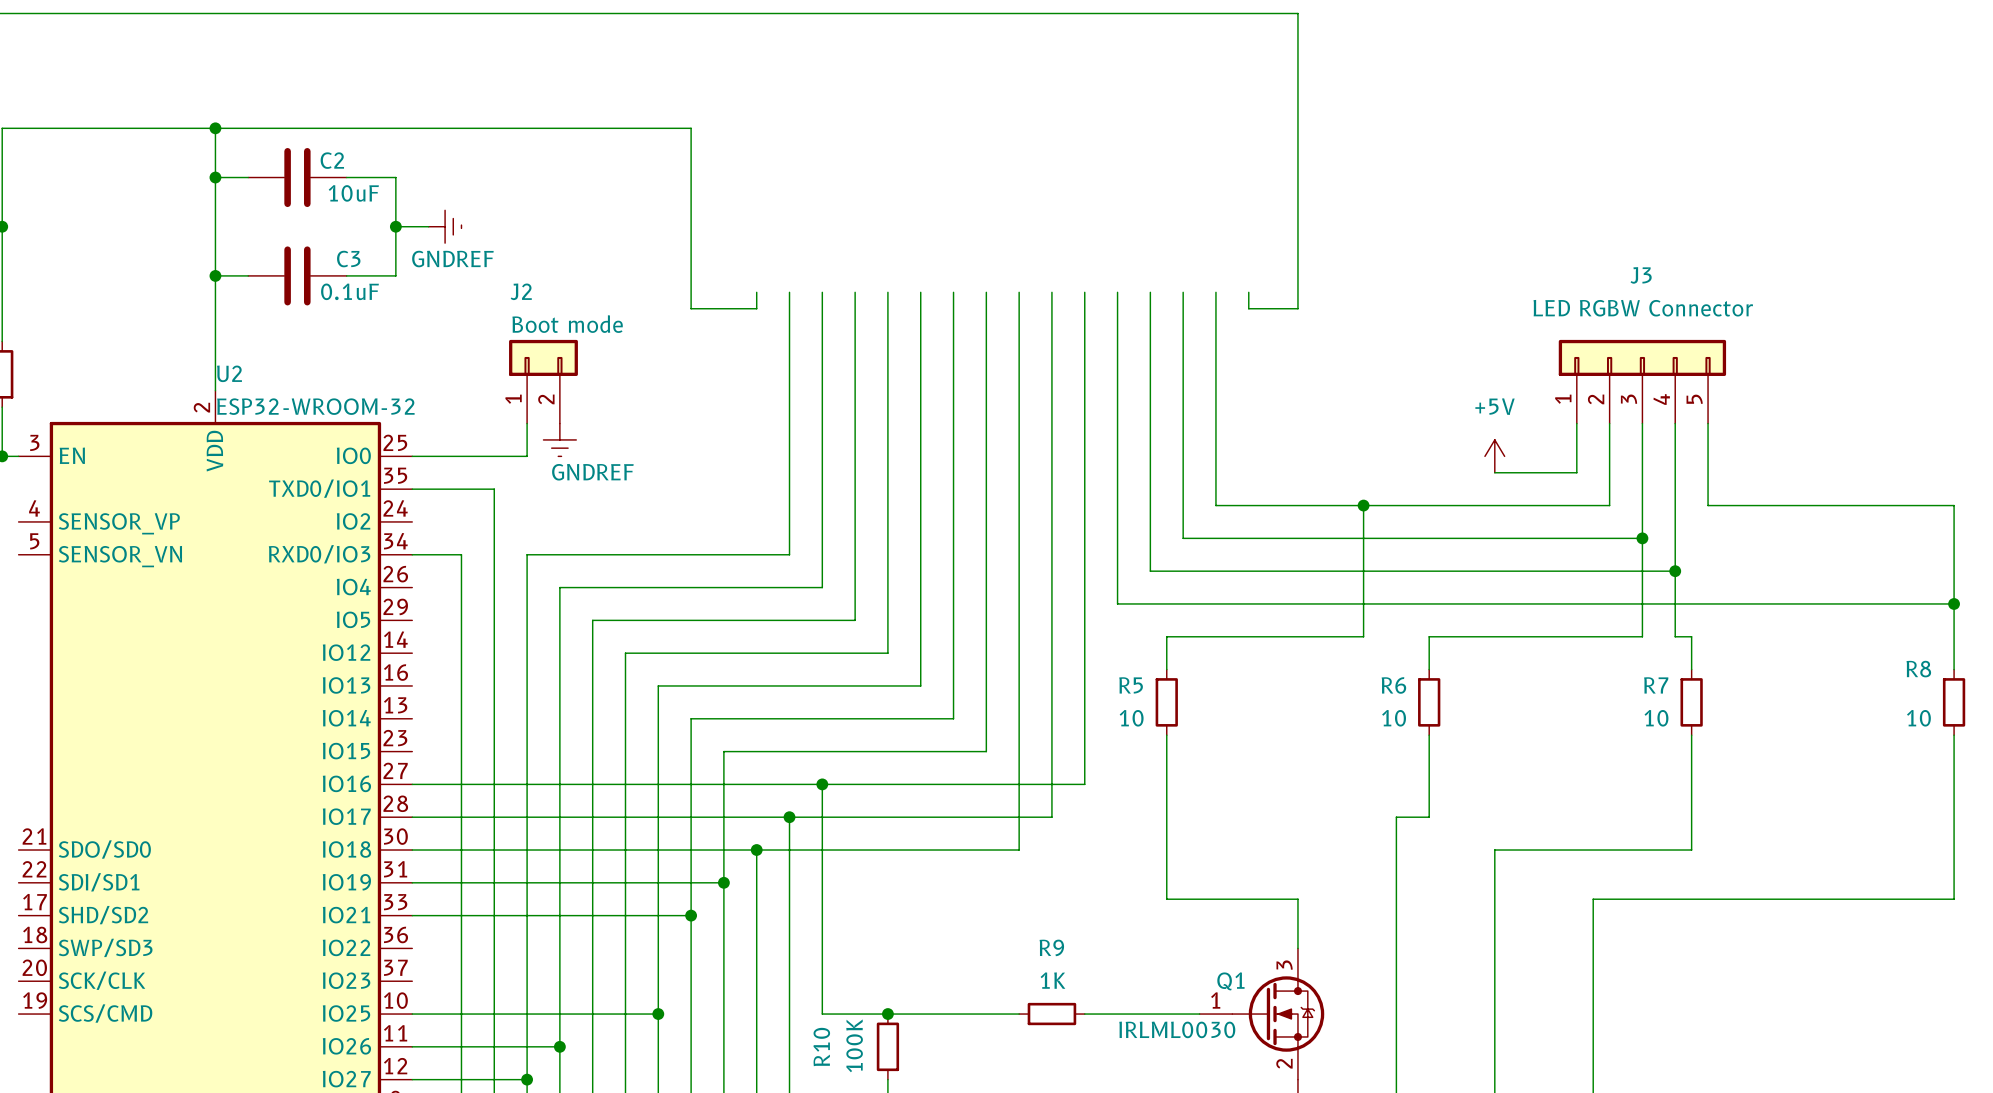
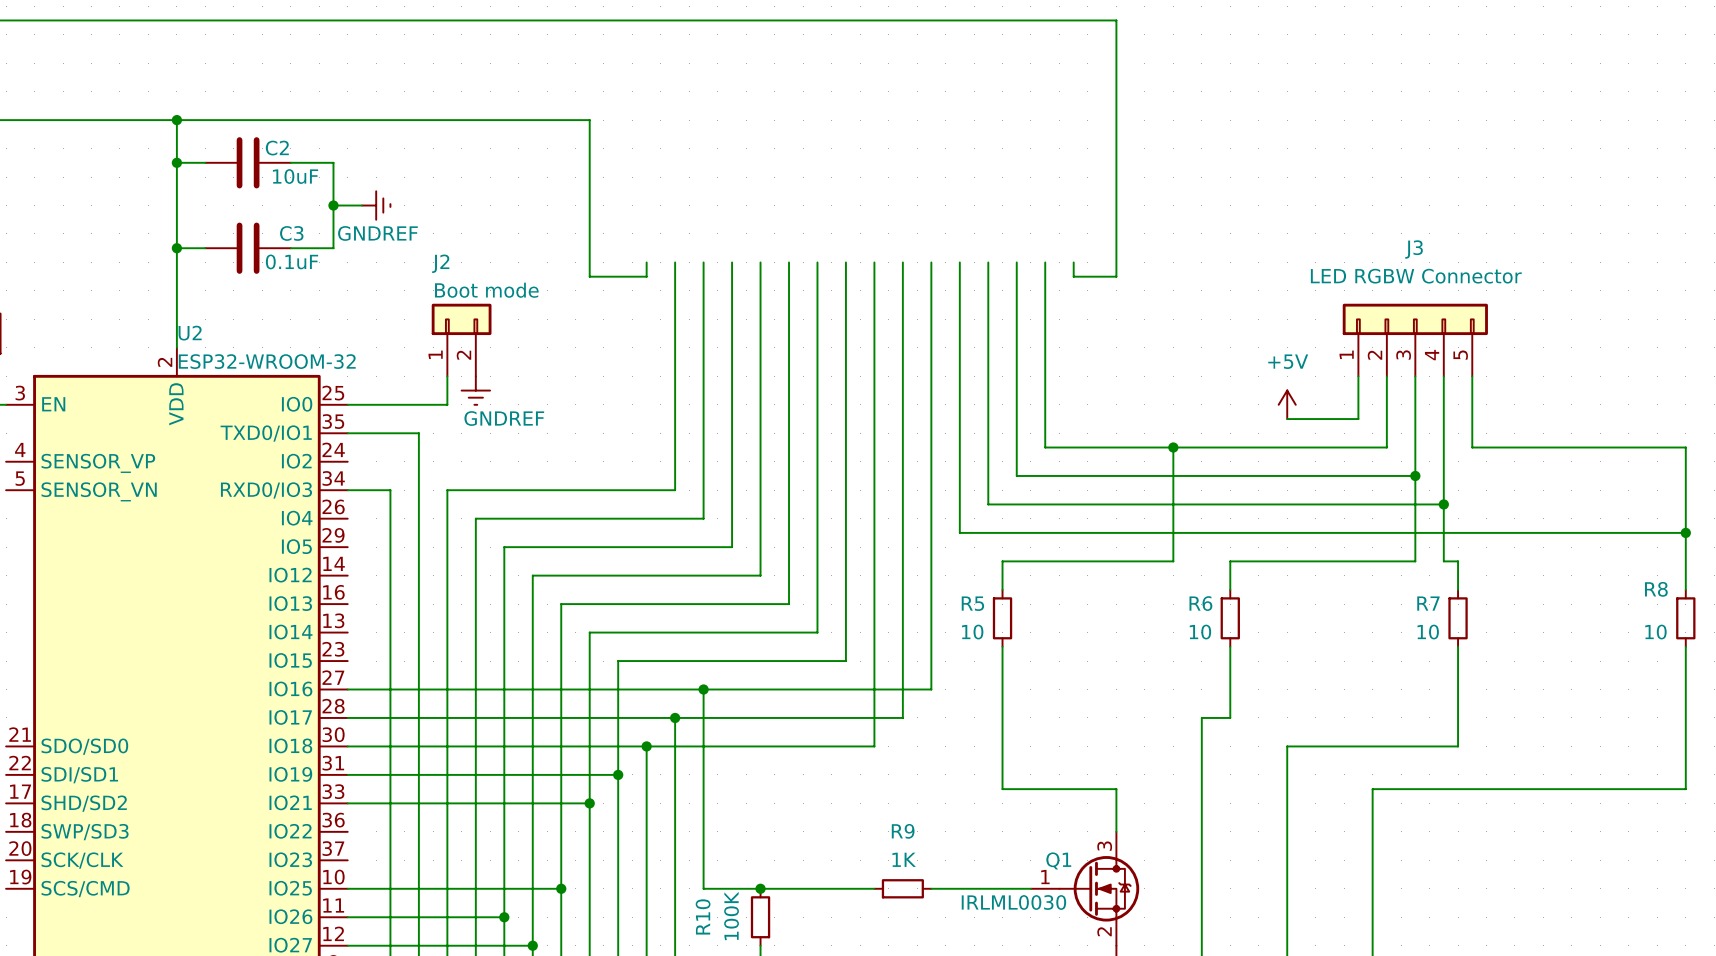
wire: none -> (475, 917) (504, 917)
junction: (559, 1046) -> none
junction: none -> (504, 917)
wire: none -> (447, 945) (532, 945)
junction: (527, 1079) -> none
junction: none -> (532, 945)

